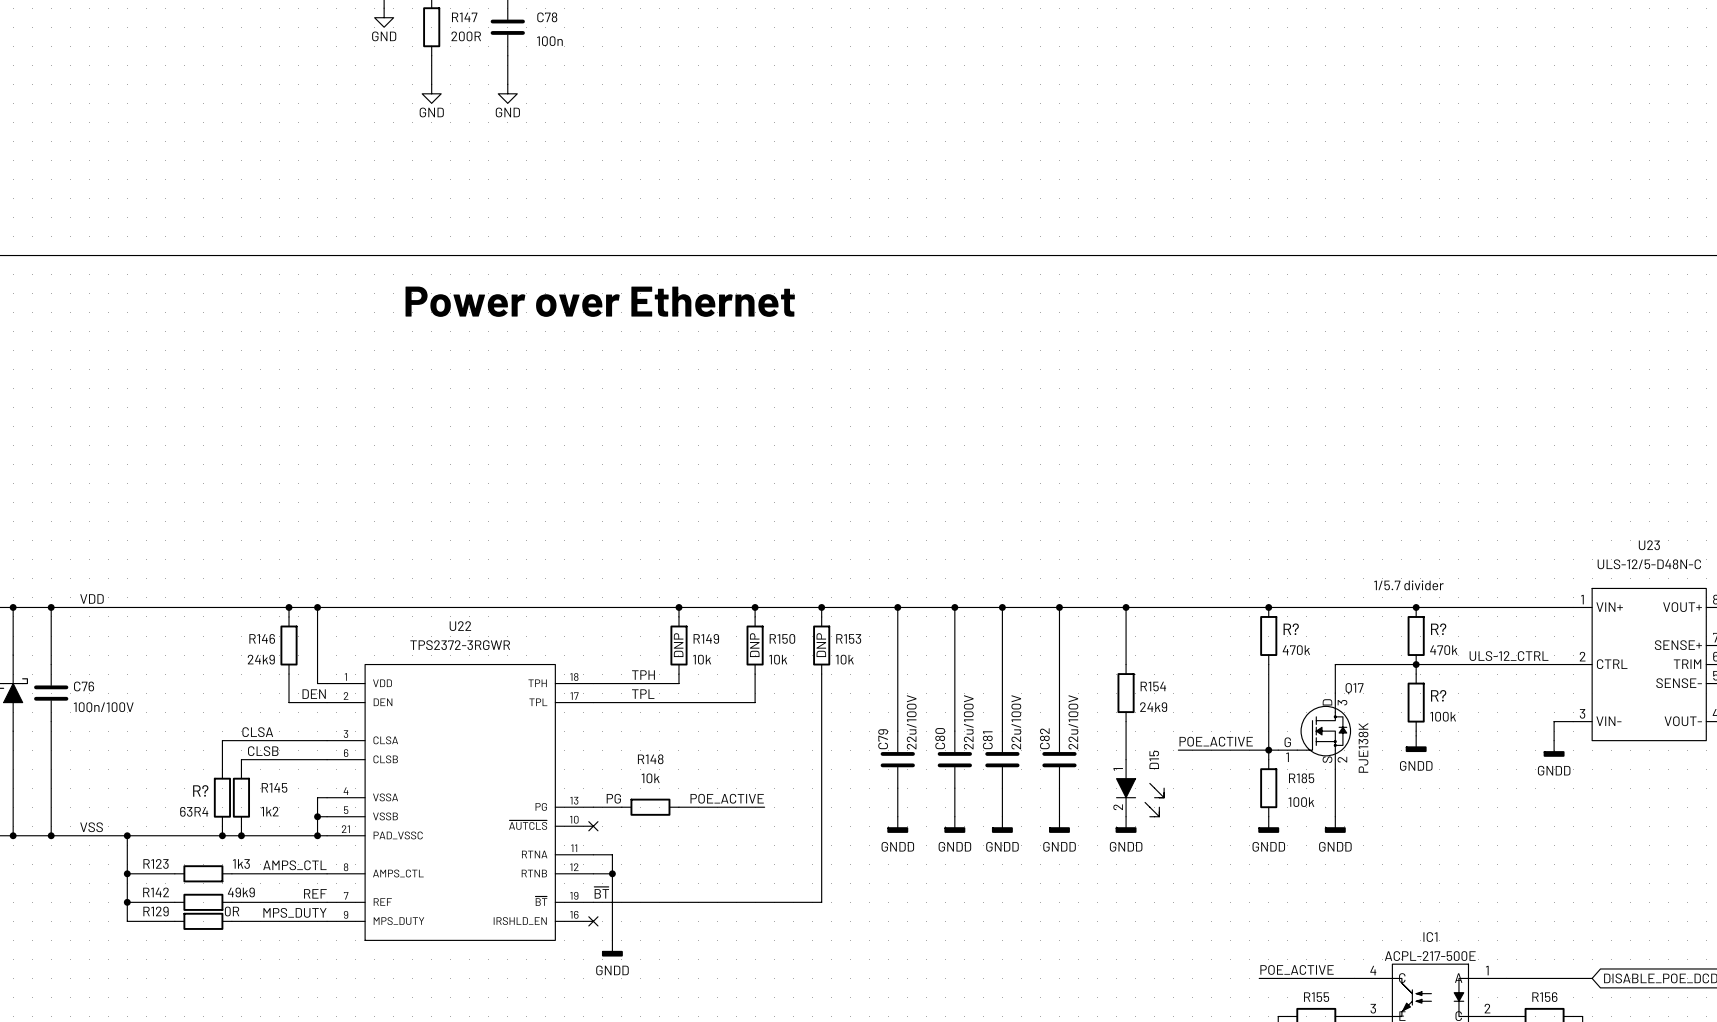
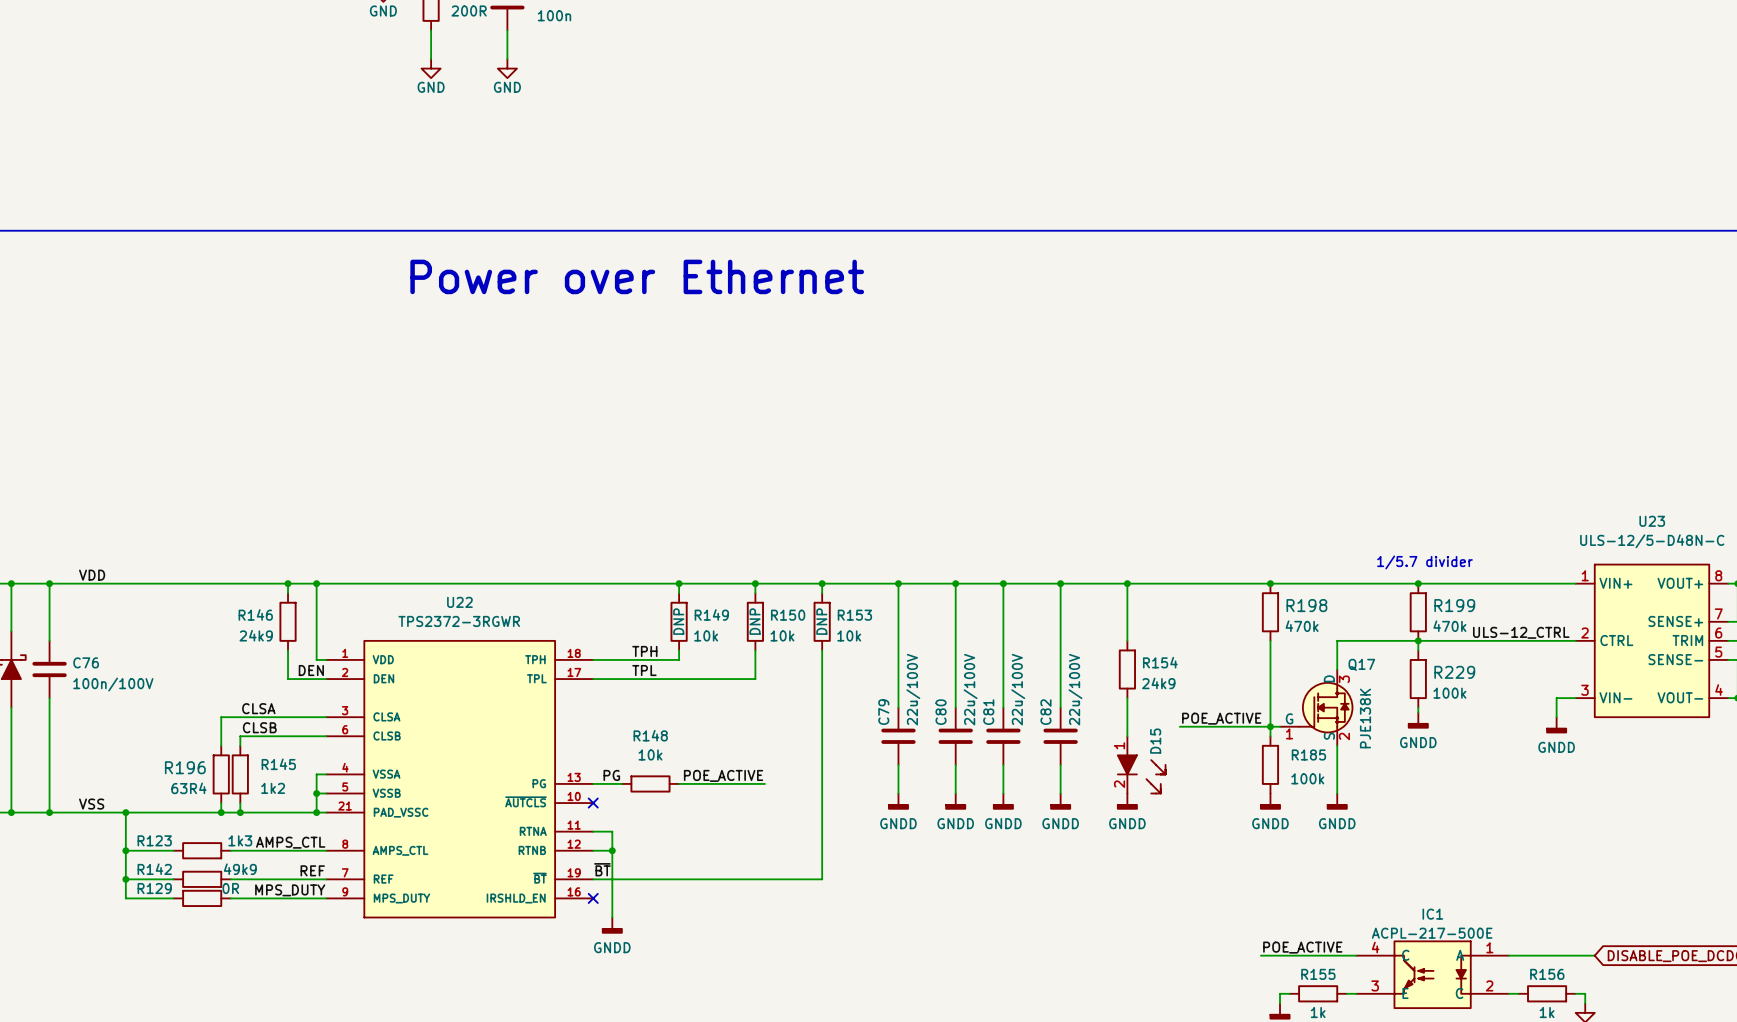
R? name: R? (1291, 629) -> R198 (1306, 605)
R? name: R? (1438, 629) -> R199 (1454, 605)
R? name: R? (1438, 695) -> R229 (1454, 672)
R? name: R? (200, 790) -> R196 (185, 767)

